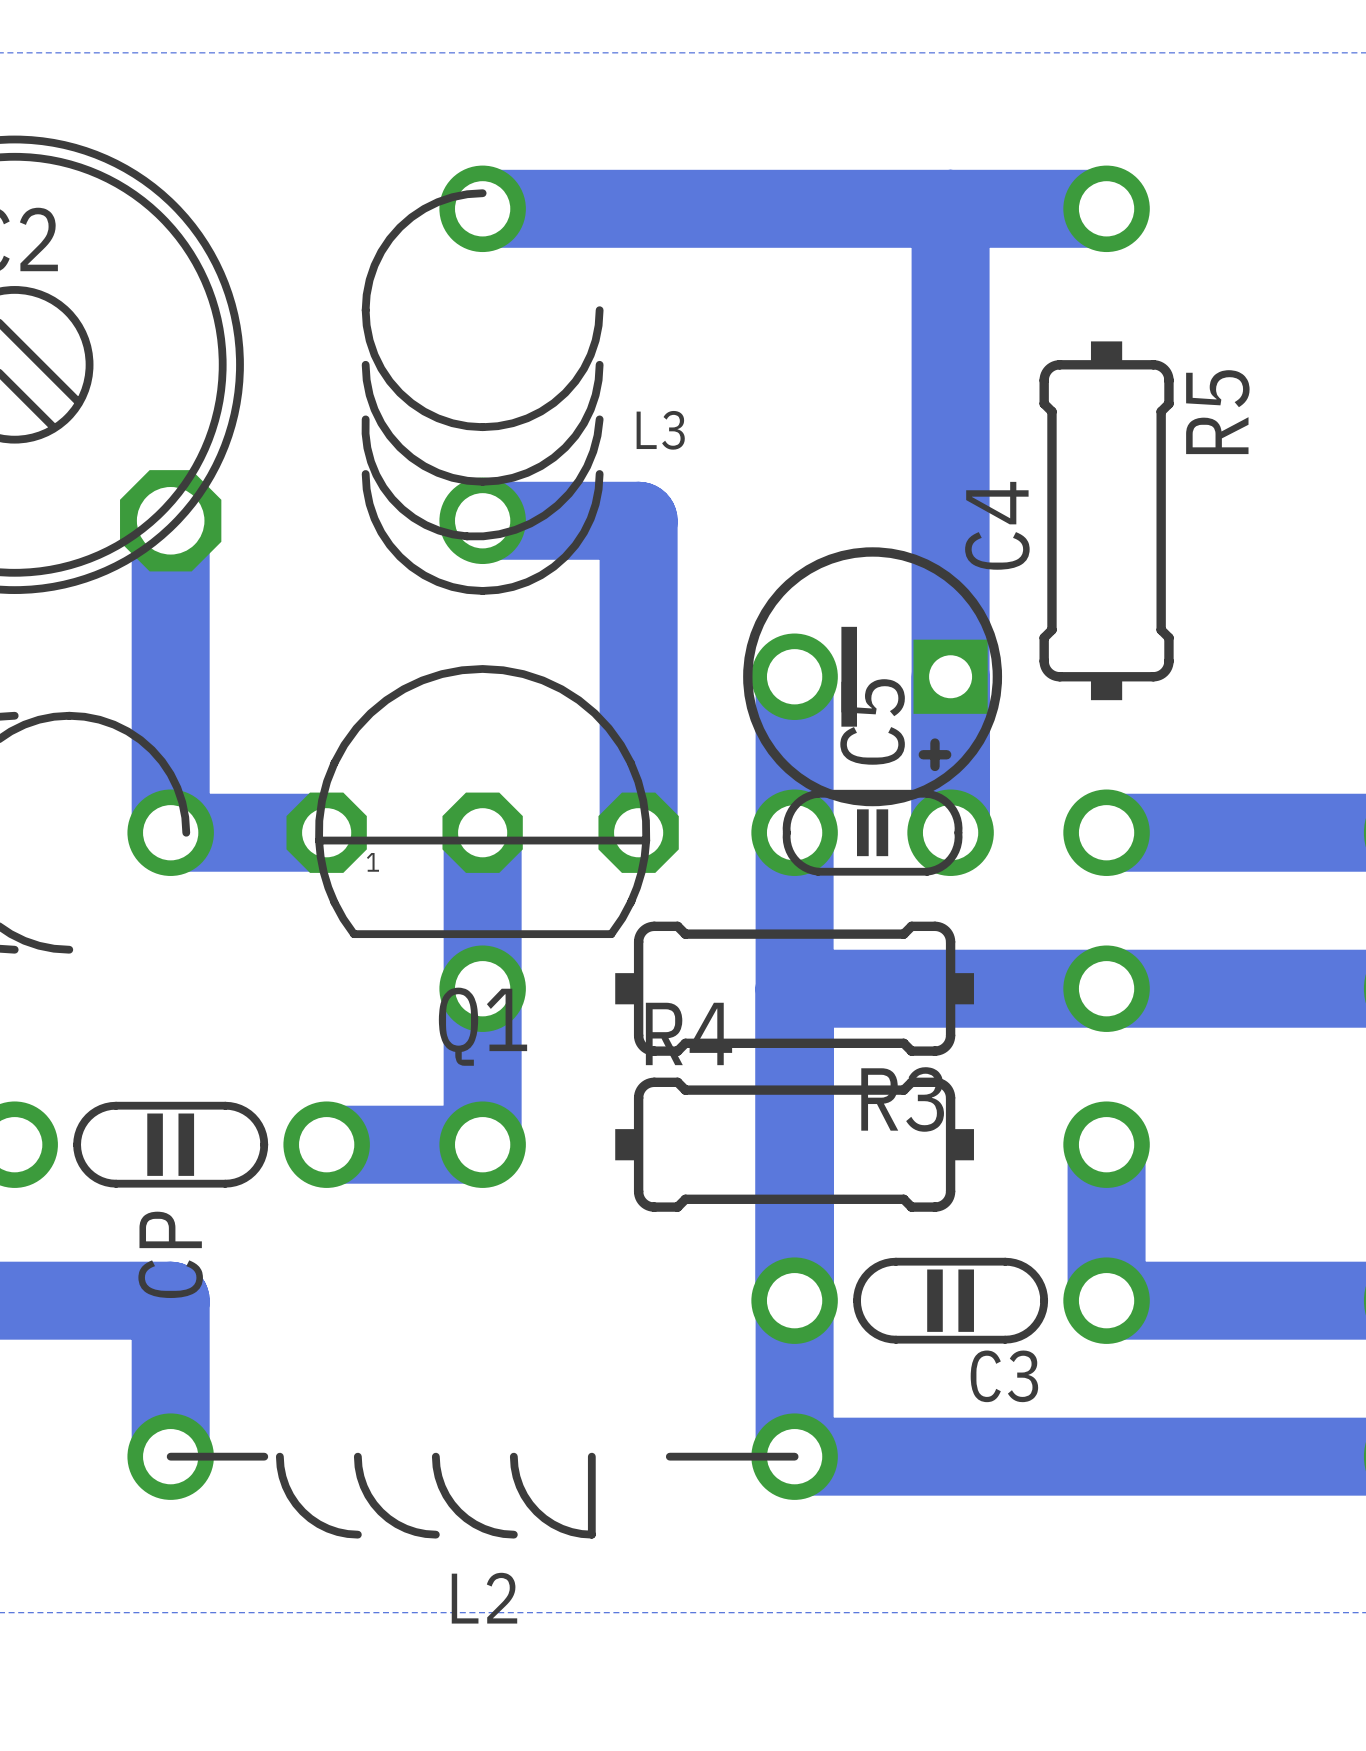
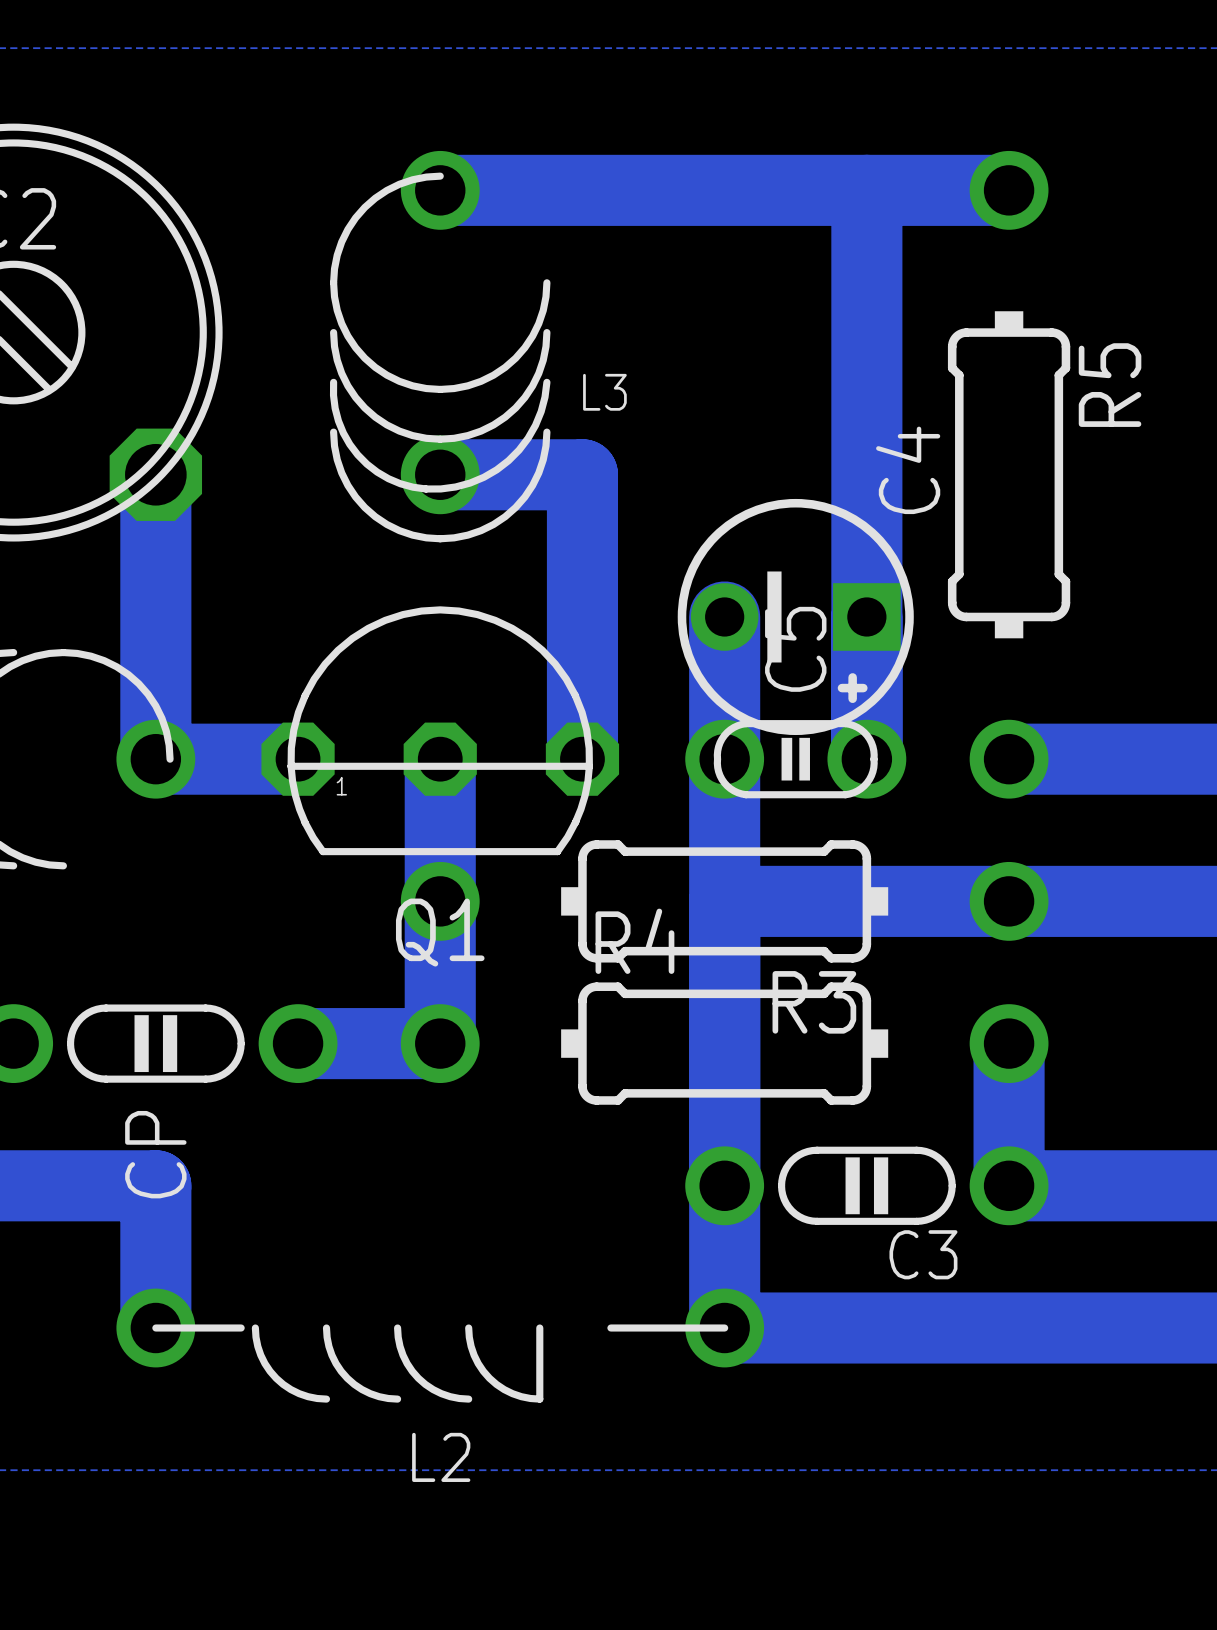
C4 footprint: [743, 547, 1003, 807] -> [677, 498, 914, 736]

